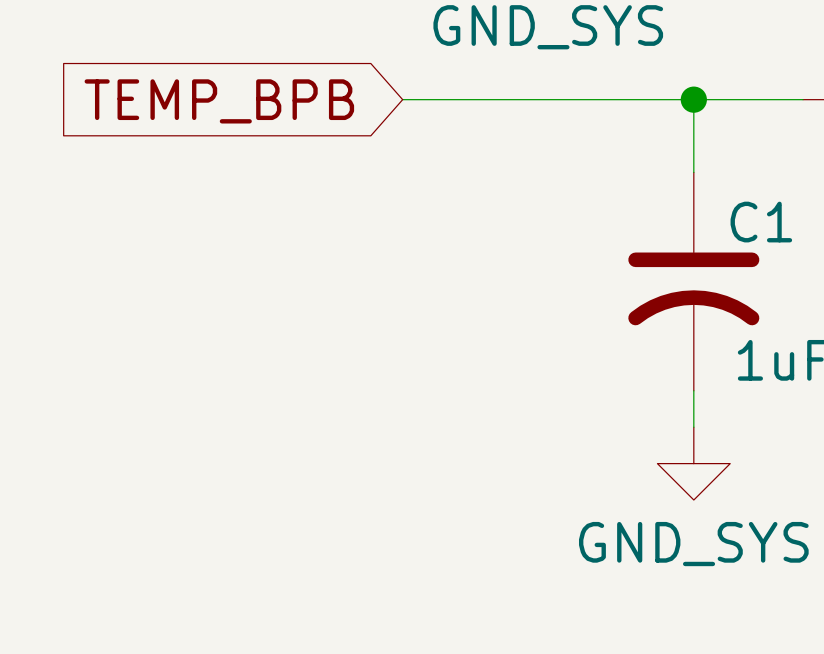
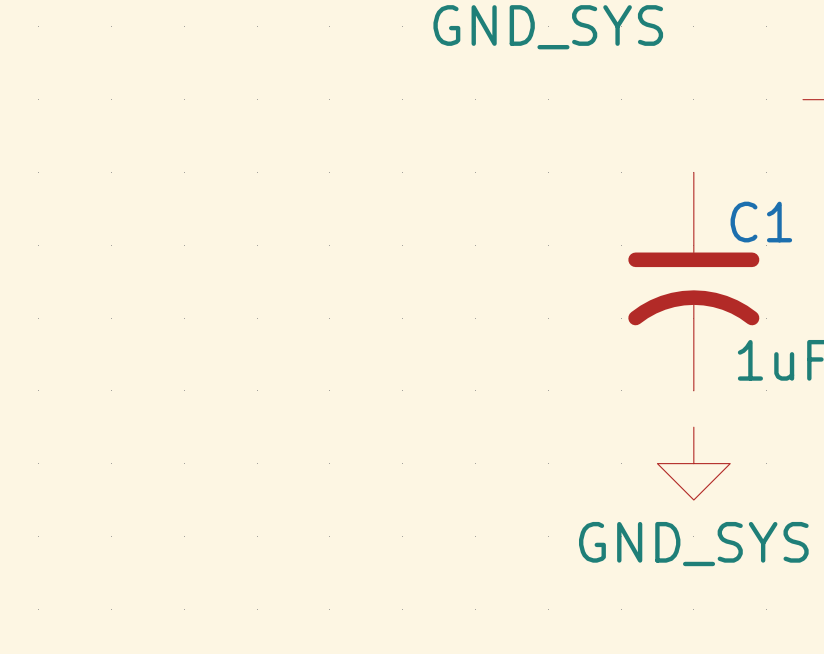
wire: (402, 99) (803, 99) -> none
wire: (693, 99) (693, 172) -> none
junction: (693, 99) -> none
global label: TEMP_BPB (219, 101) -> none
wire: (693, 390) (693, 427) -> none

